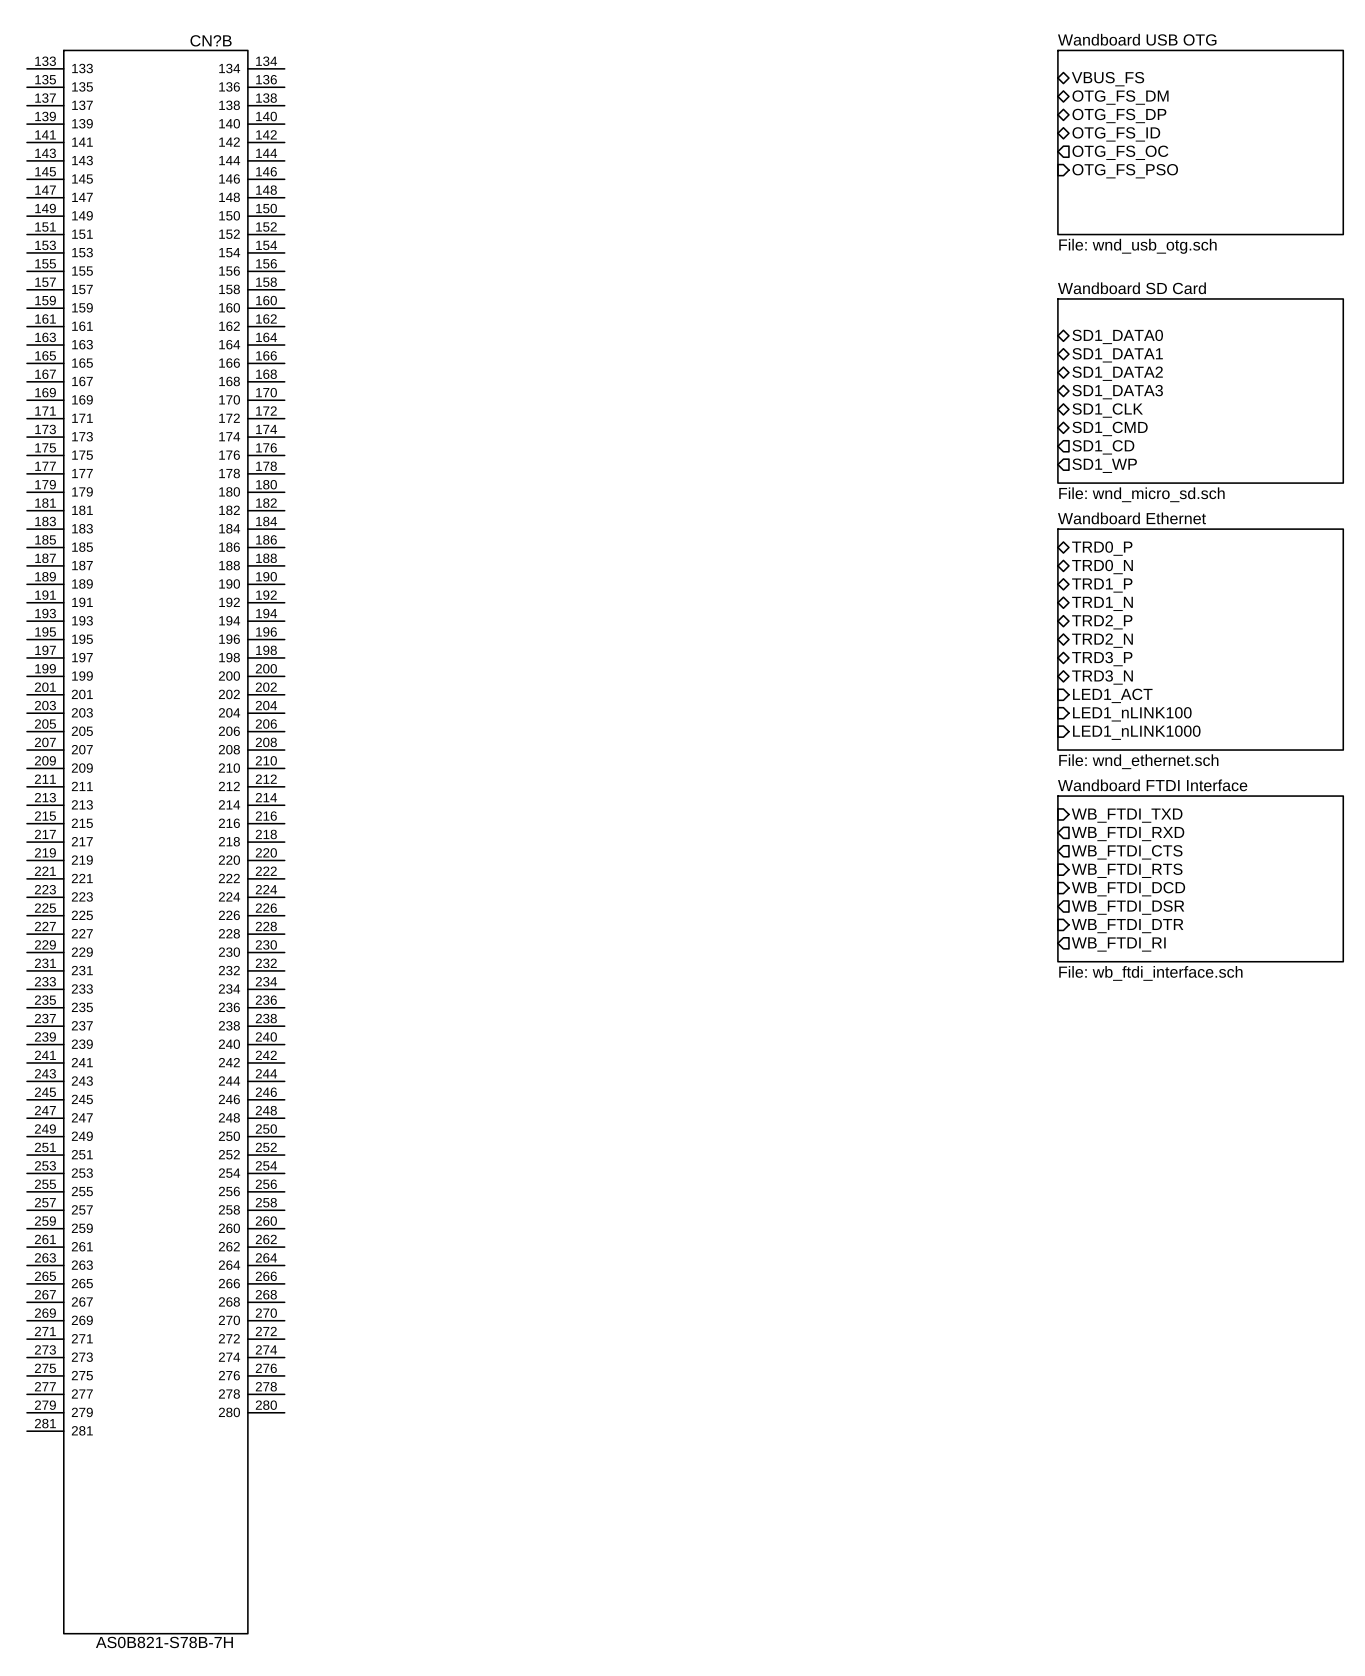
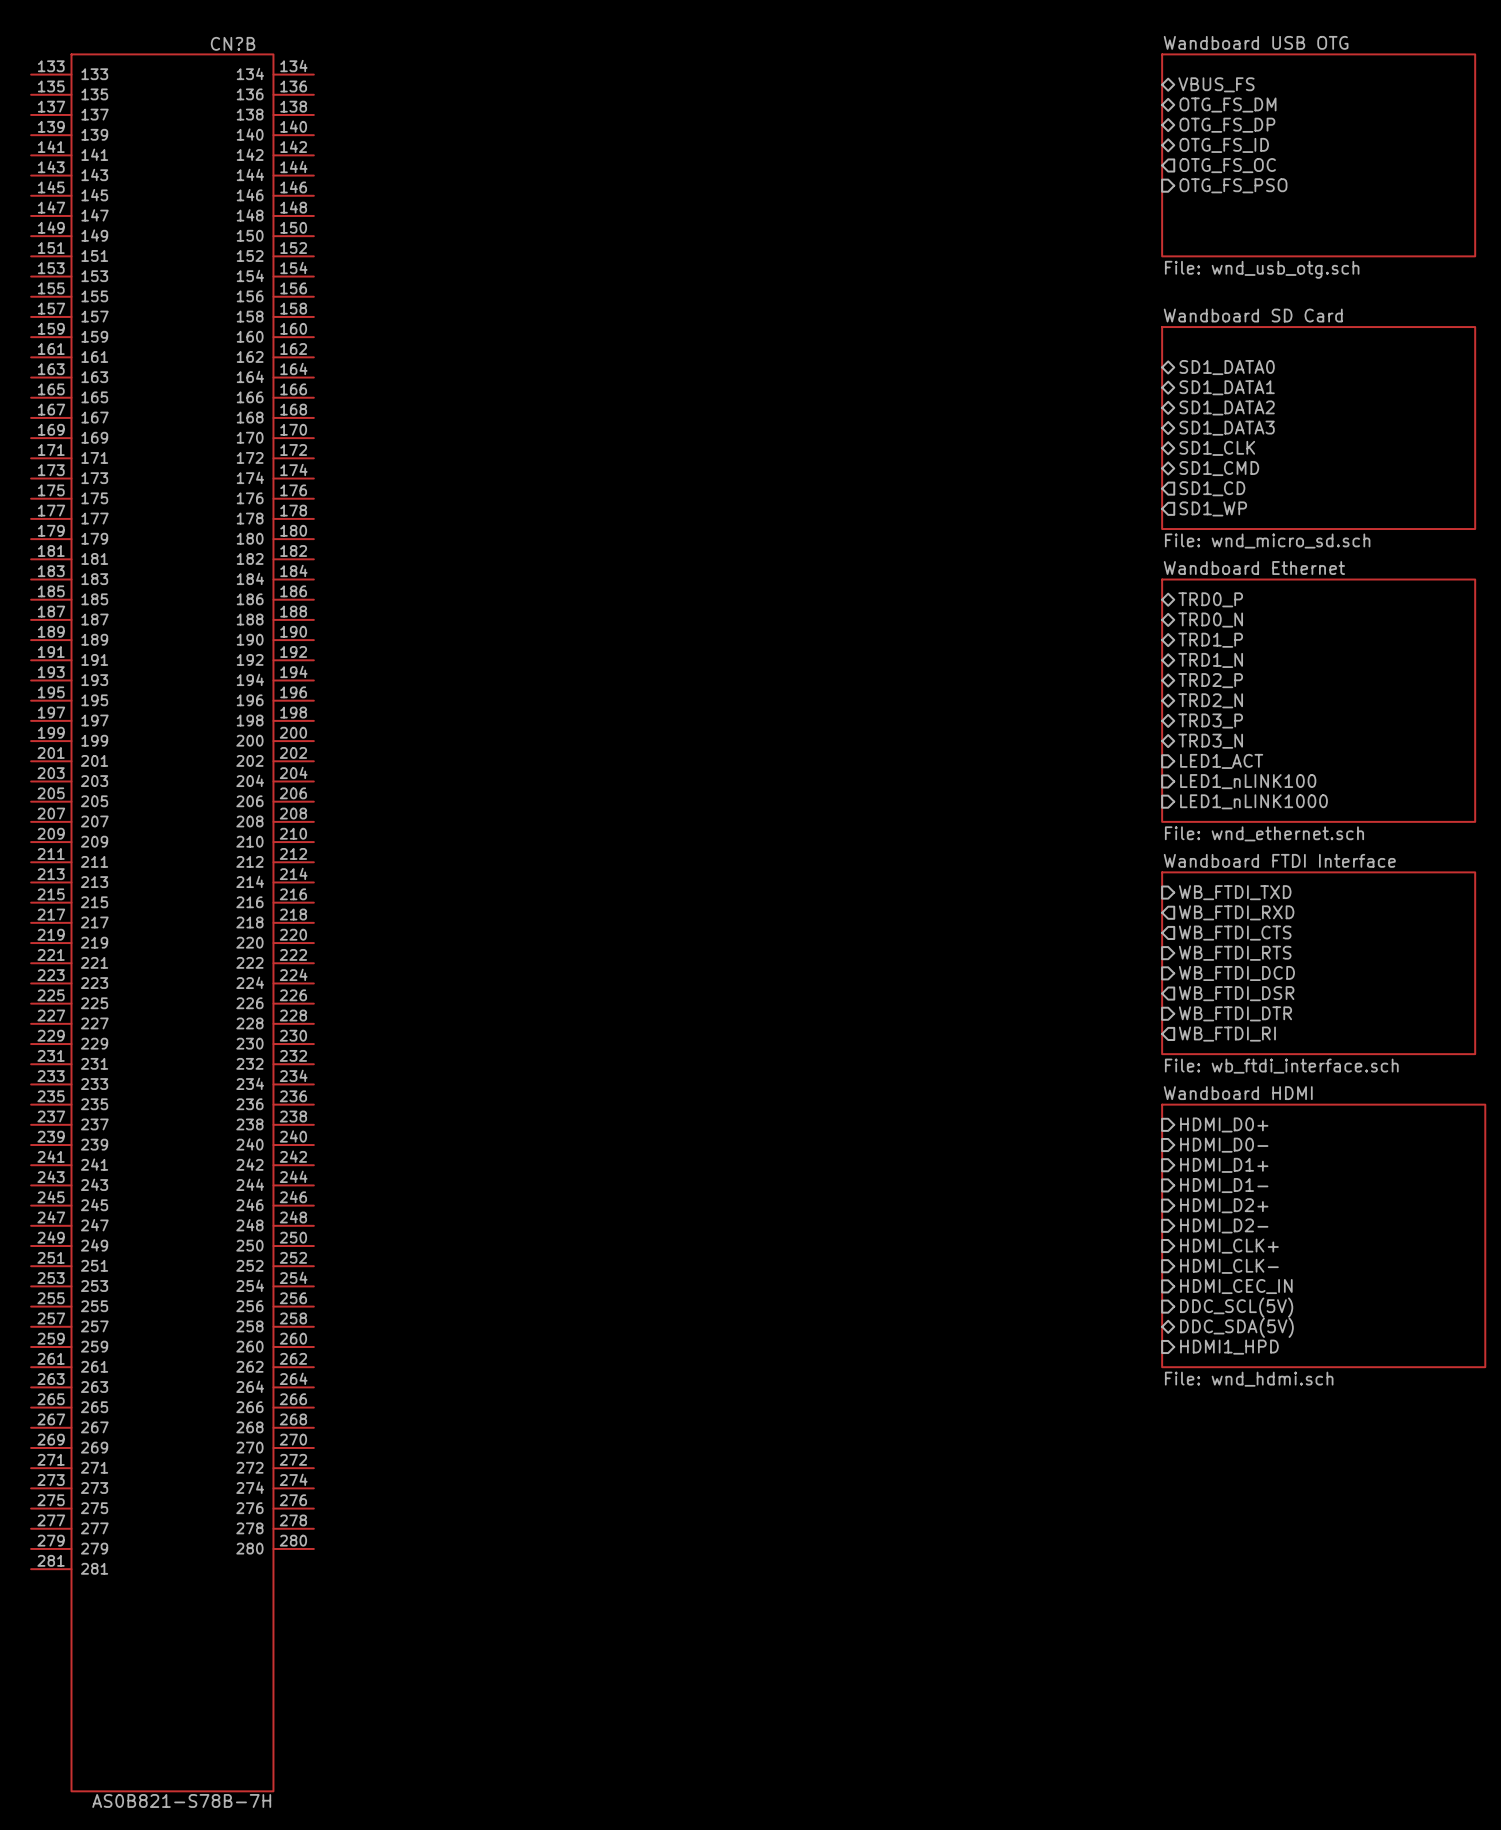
sheet pin: none -> HDMI_D0+ (1224, 1124)
sheet pin: none -> HDMI_D0- (1224, 1145)
sheet pin: none -> HDMI_D1+ (1224, 1165)
sheet pin: none -> HDMI_D1- (1224, 1185)
sheet pin: none -> HDMI_D2+ (1224, 1205)
sheet pin: none -> HDMI_D2- (1224, 1225)
sheet Wandboard HDMI: none -> File: wnd_hdmi.sch (1323, 1235)
sheet pin: none -> HDMI_CLK+ (1229, 1246)
sheet pin: none -> HDMI_CLK- (1229, 1266)
sheet pin: none -> HDMI_CEC_IN (1236, 1286)
sheet pin: none -> DDC_SCL(5V) (1236, 1307)
sheet pin: none -> DDC_SDA(5V) (1236, 1327)
sheet pin: none -> HDMI1_HPD (1229, 1347)

